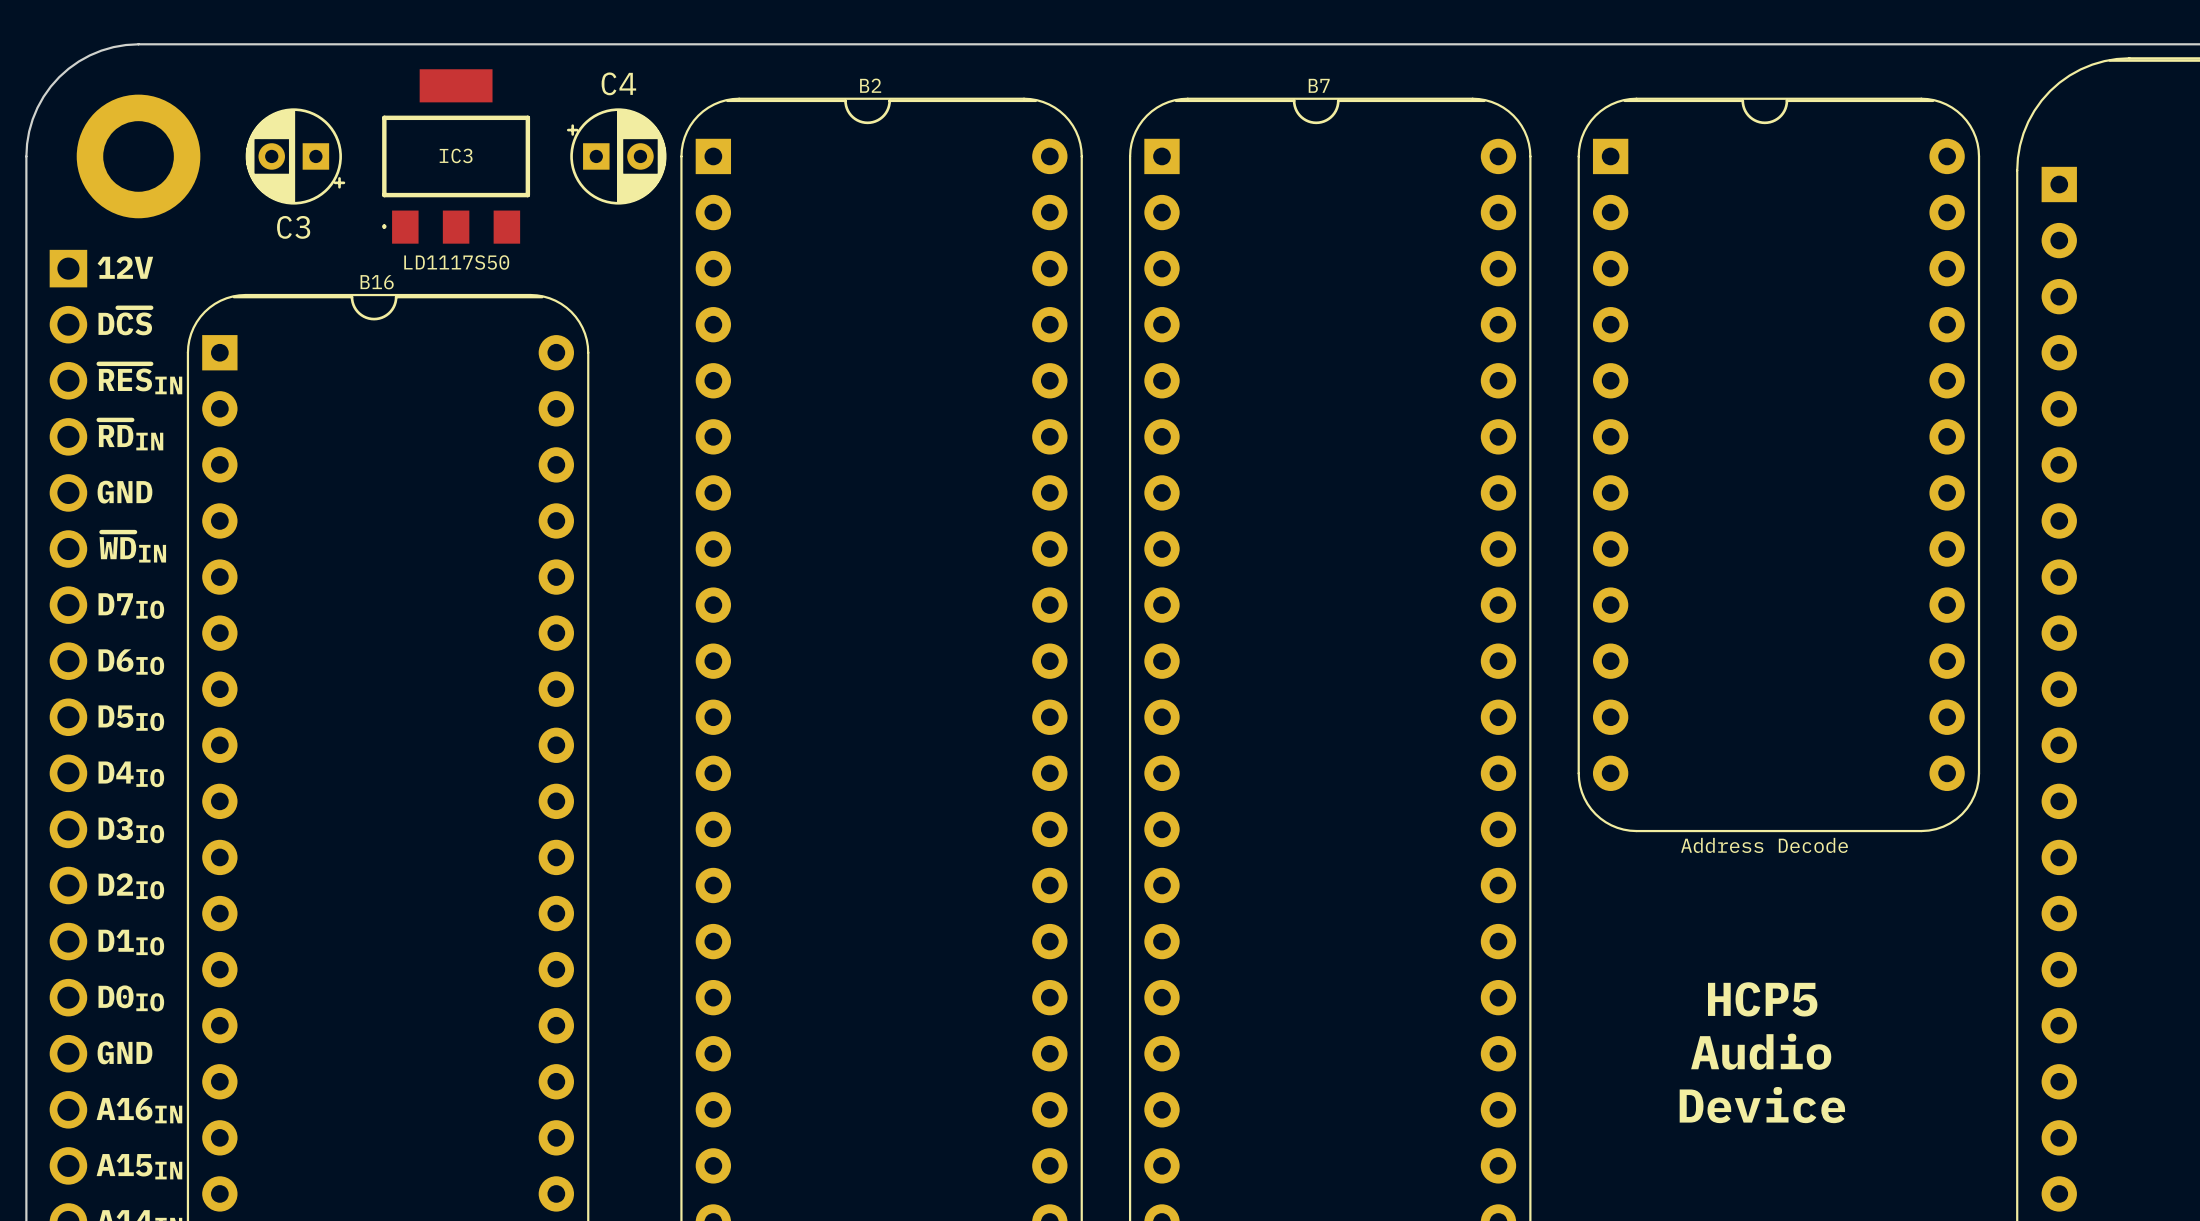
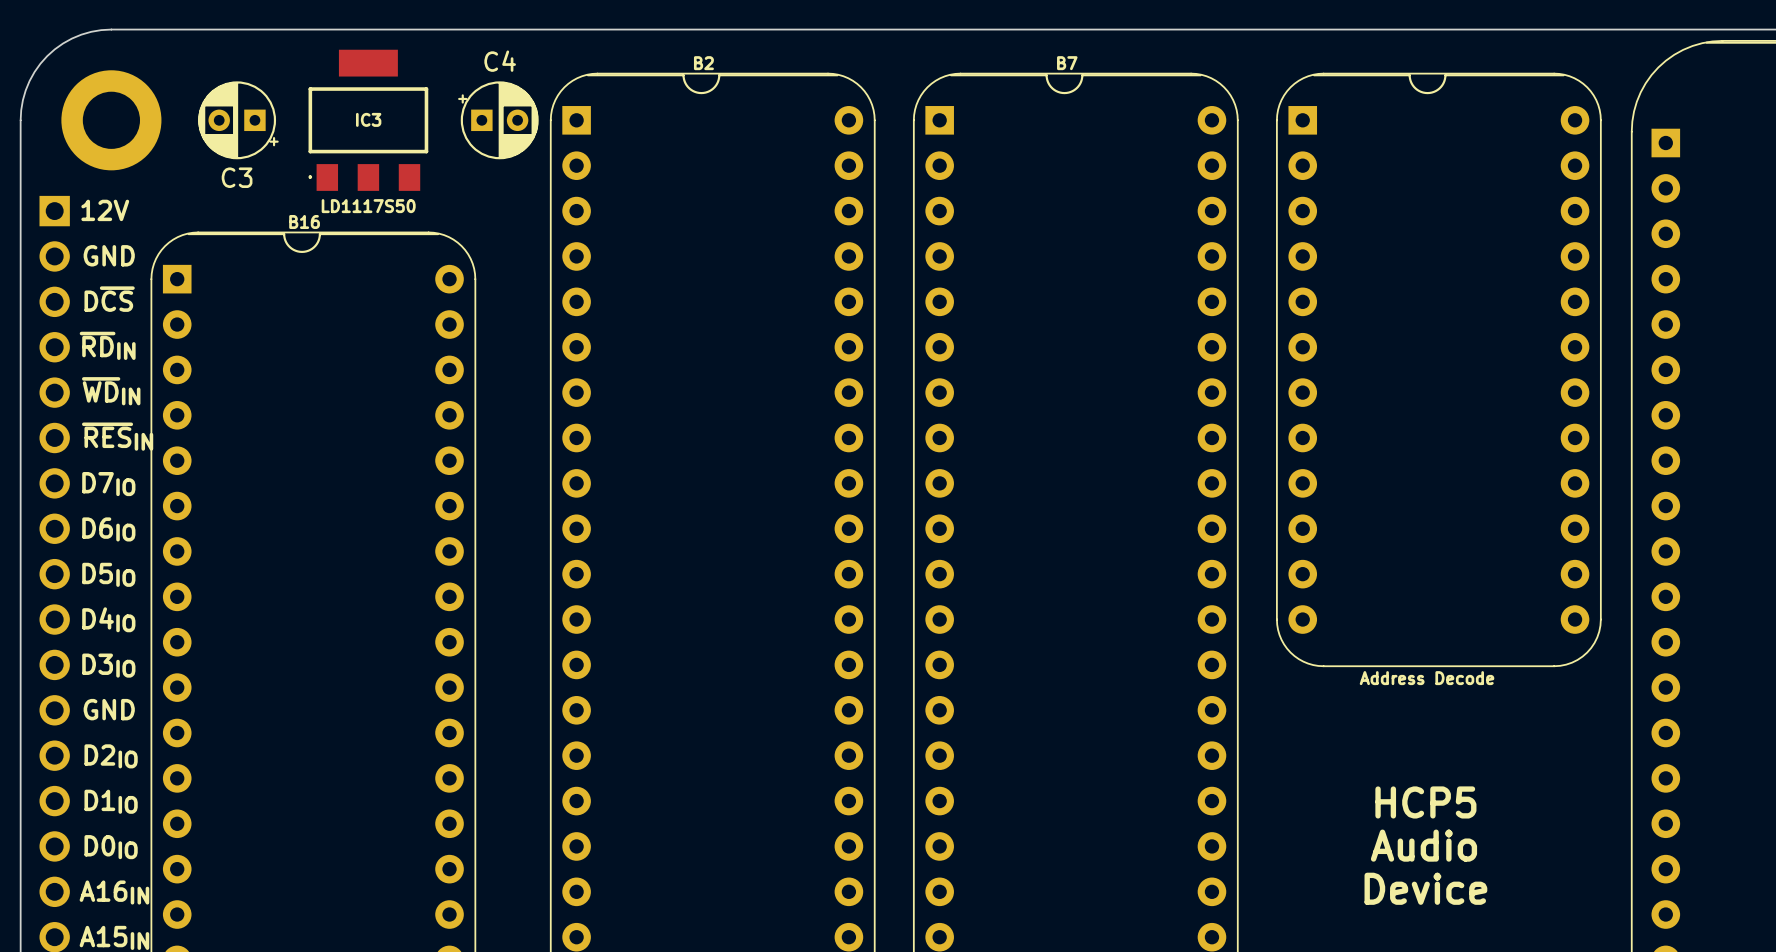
text position: D~{CS} (125, 321) -> D~{CS} (109, 299)
text: ~{RES}IN (140, 379) -> none
text: none -> ~{WD}IN (111, 391)
text position: GND (124, 492) -> GND (109, 255)
text: ~{WD}IN (132, 547) -> ~{RES}IN (117, 436)
text position: D2IO (131, 886) -> D2IO (111, 756)
text position: D1IO (131, 942) -> D1IO (111, 801)
text position: D0IO (131, 998) -> D0IO (111, 847)
text position: GND (124, 1052) -> GND (109, 709)

